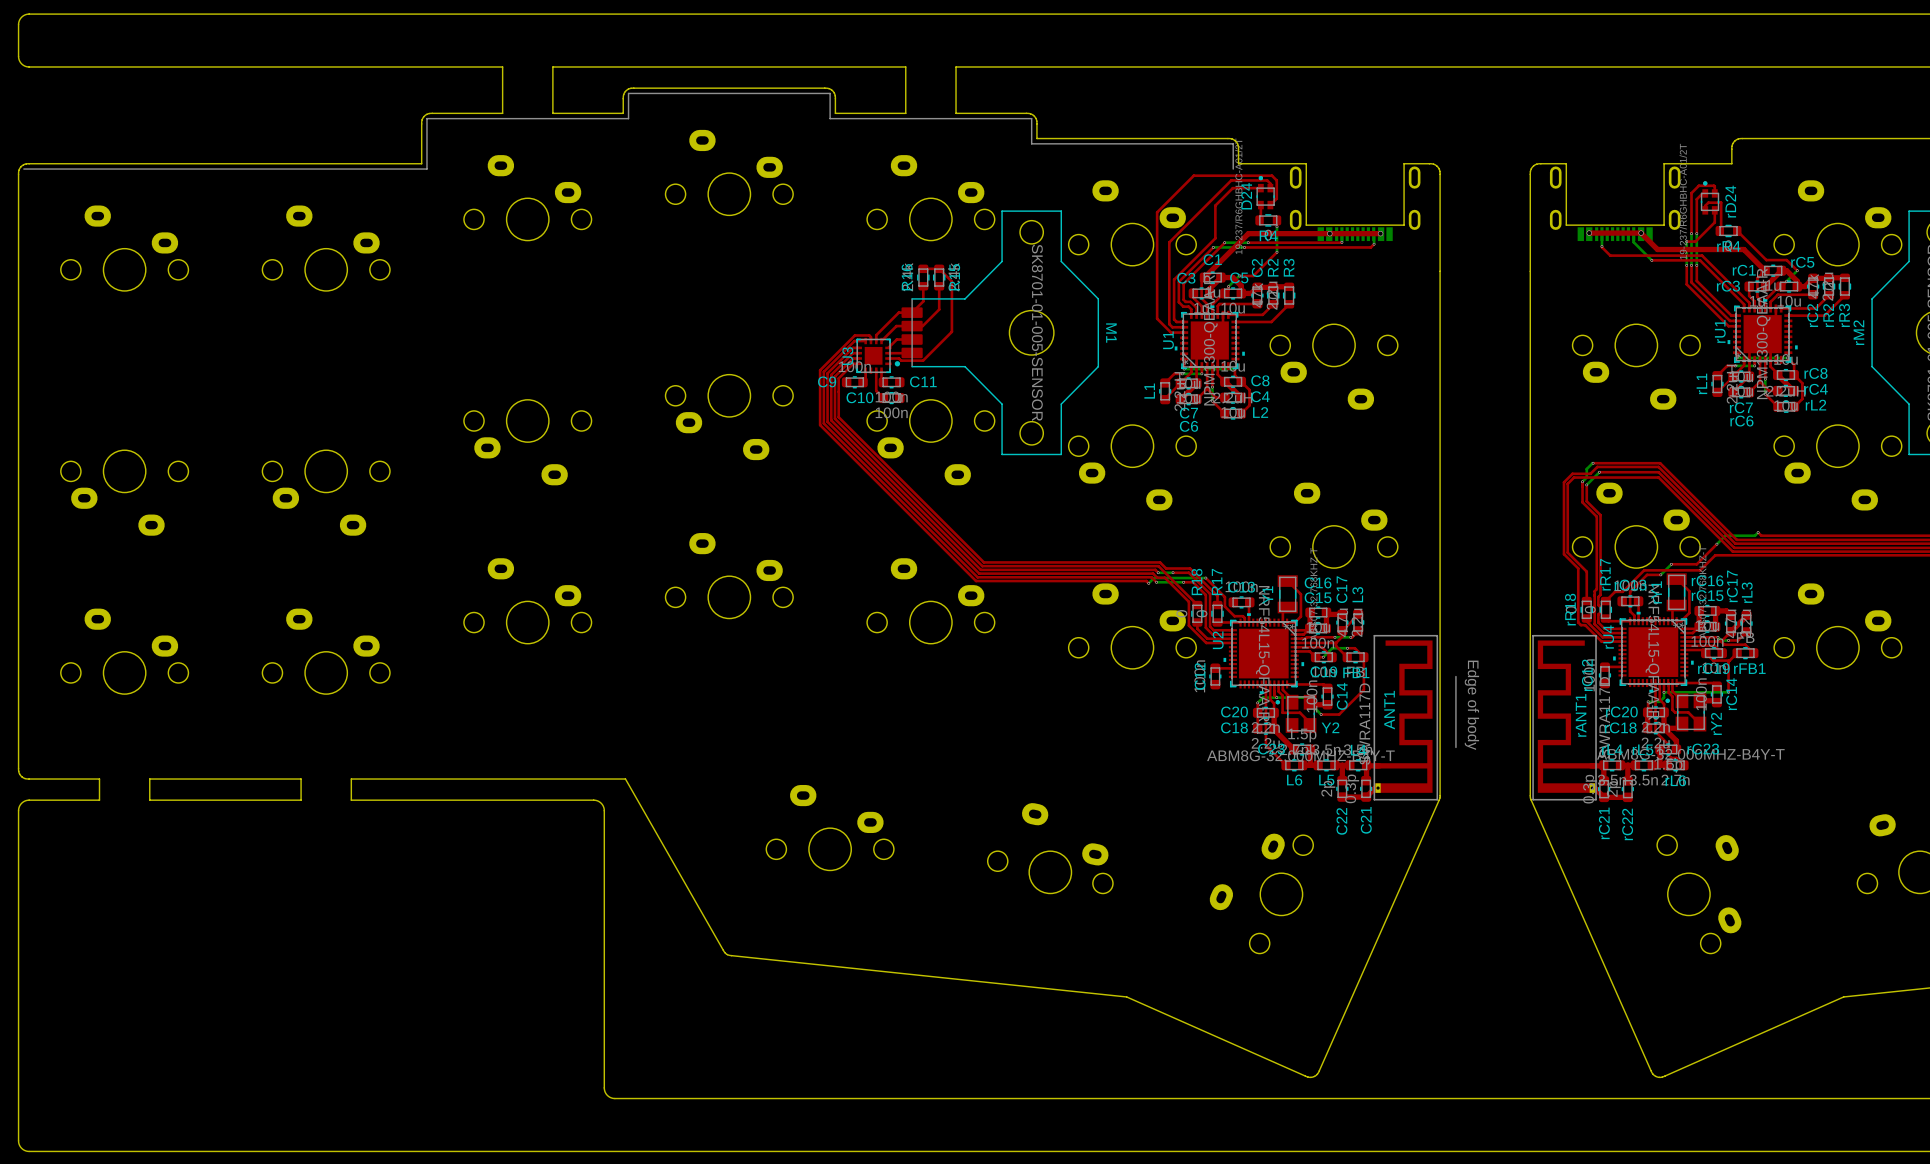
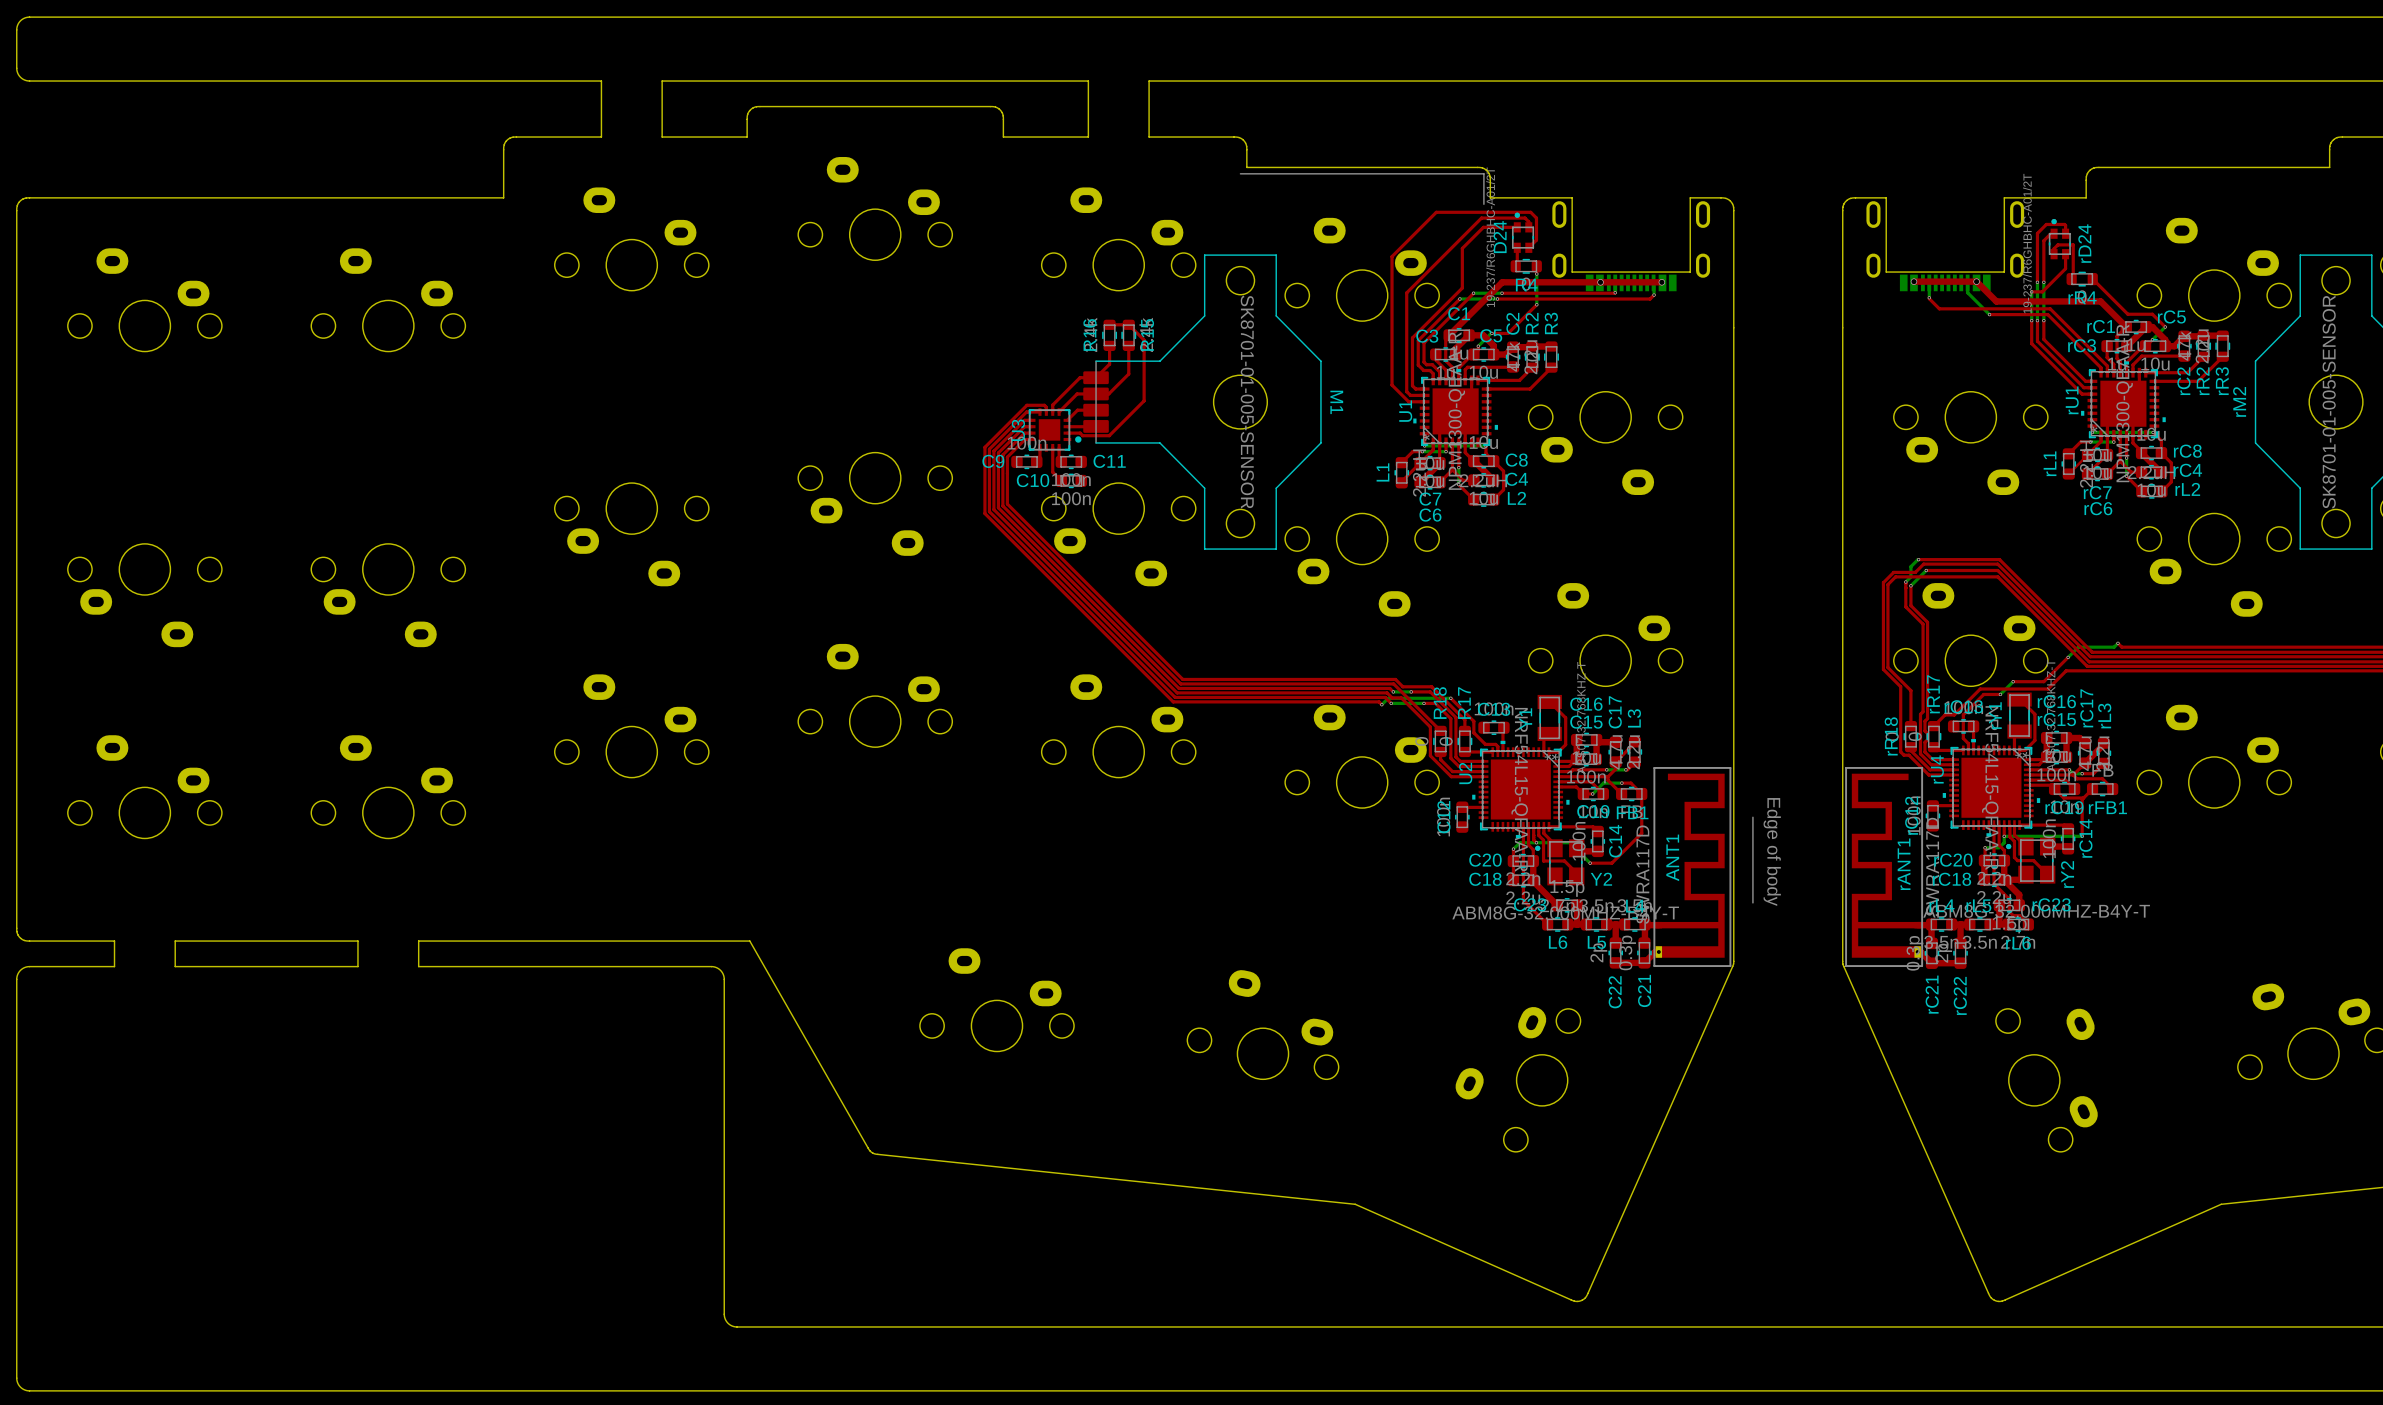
line: (1031, 143) (1031, 118) (830, 118) (830, 93) (628, 93) (628, 118) (426, 118) (426, 169) (23, 169) -> none

